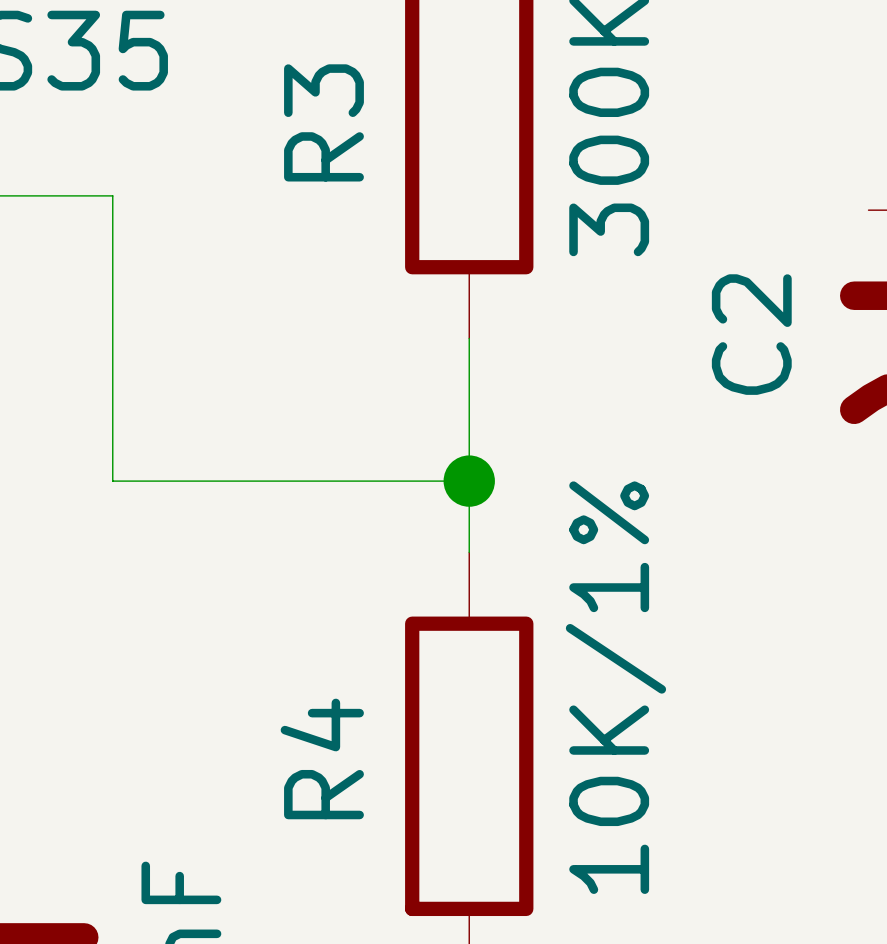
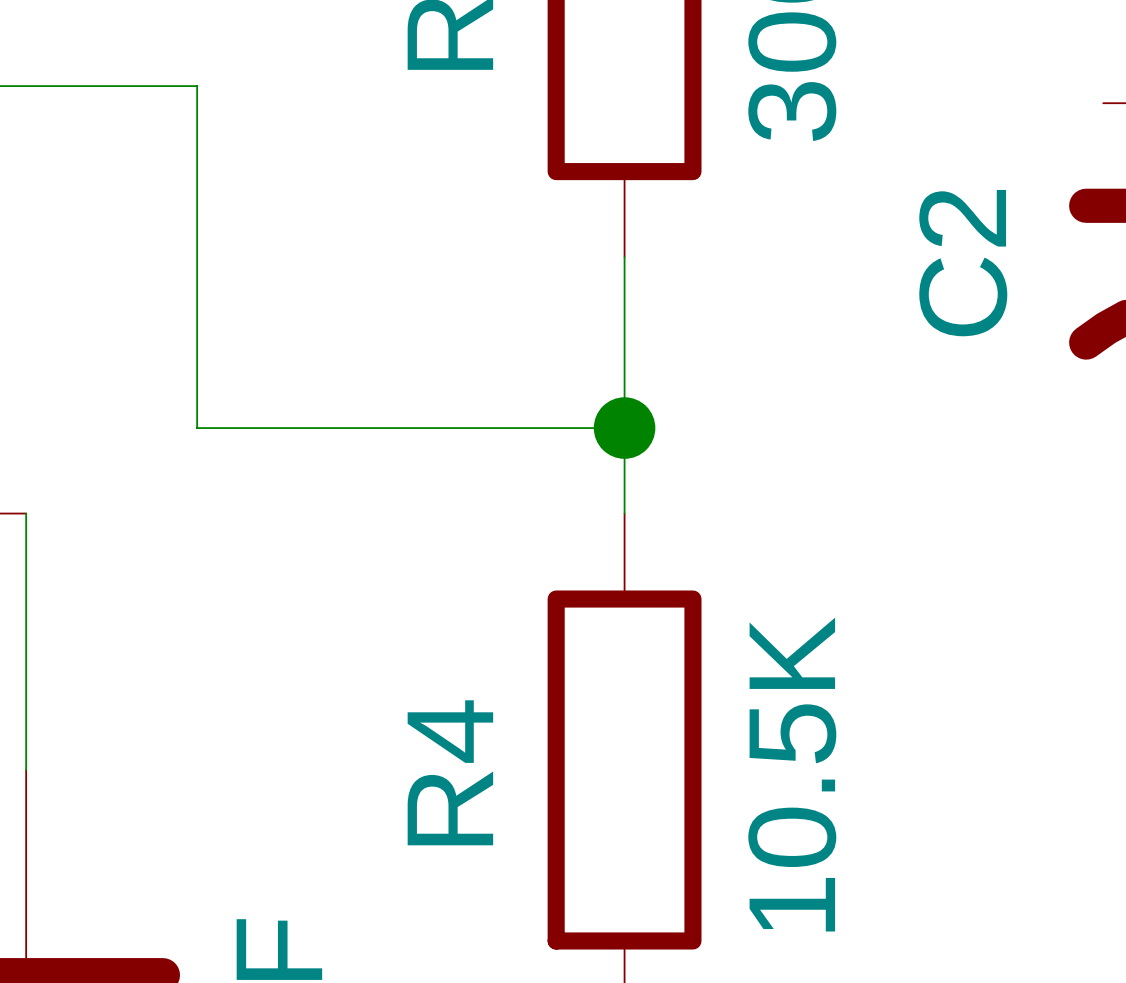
R4 value: 10K/1% (615, 687) -> 10.5K (792, 774)

